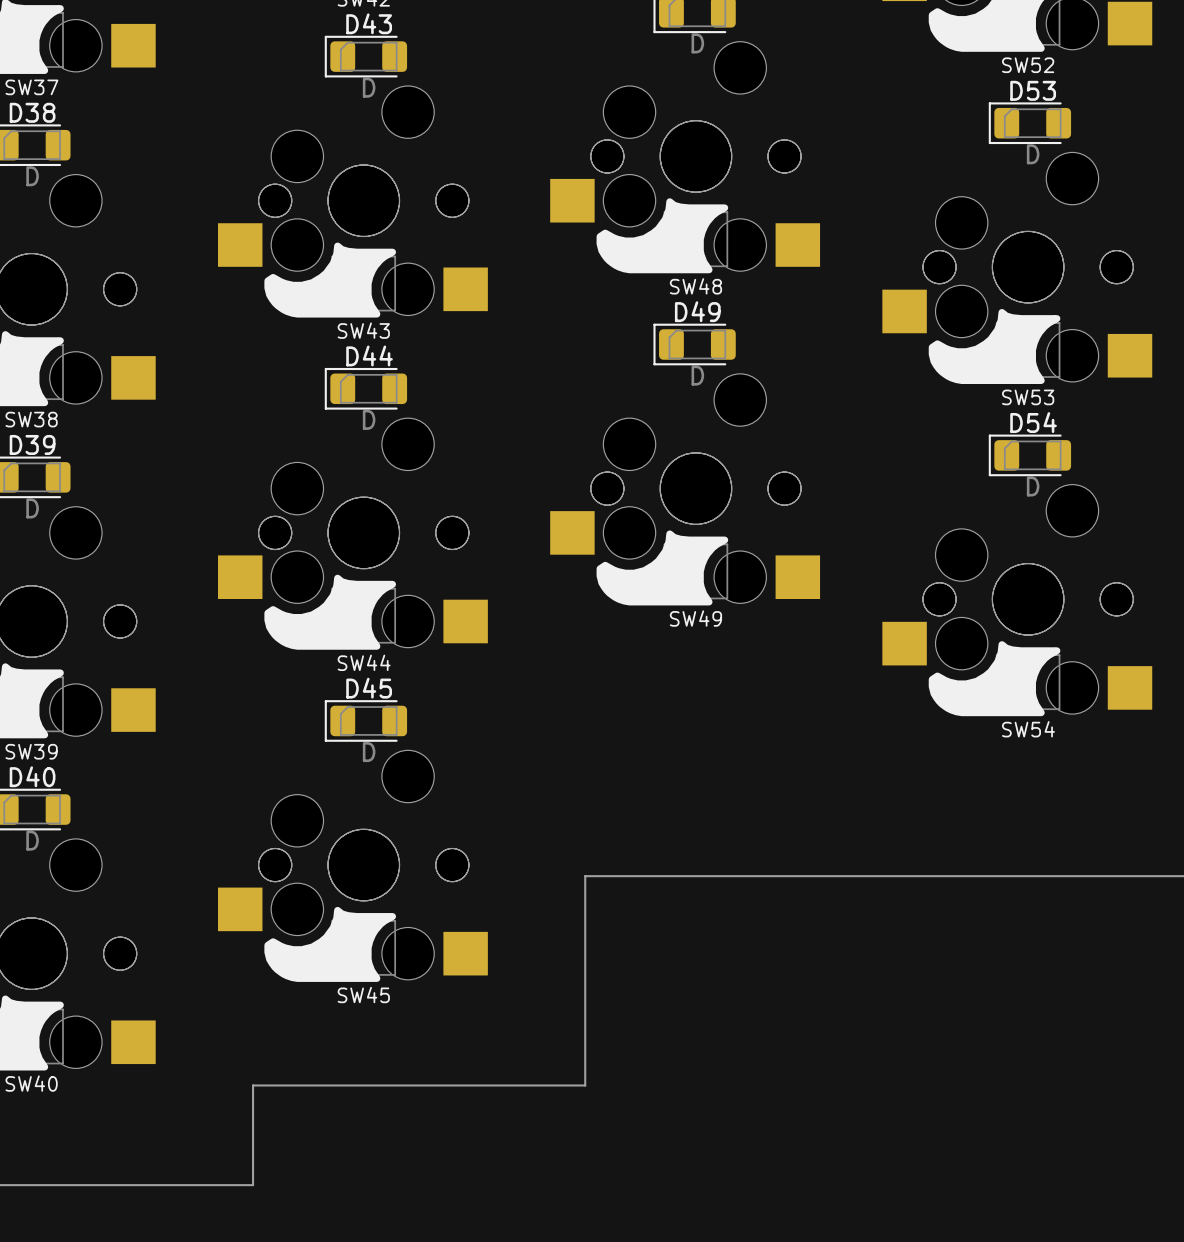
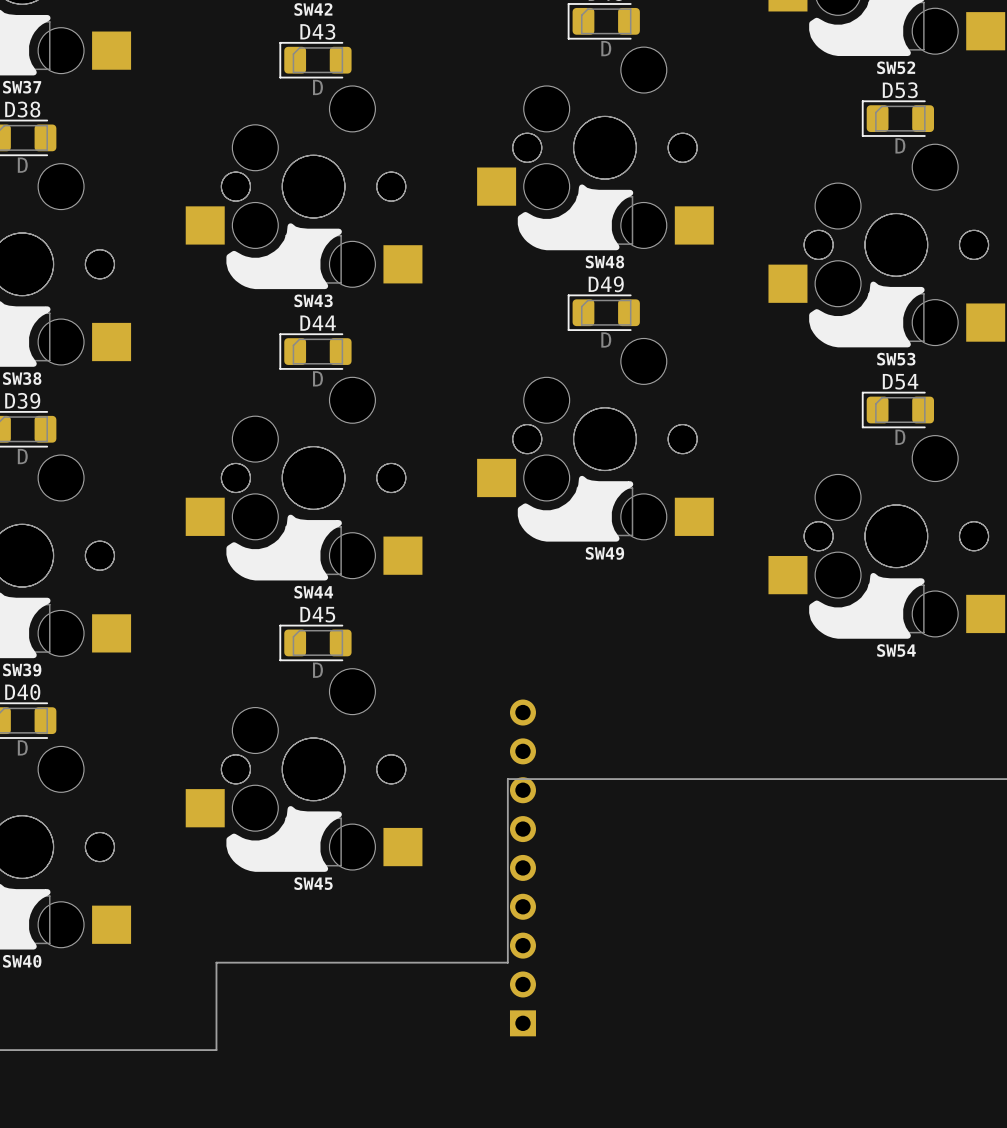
part: none -> (522, 867)

